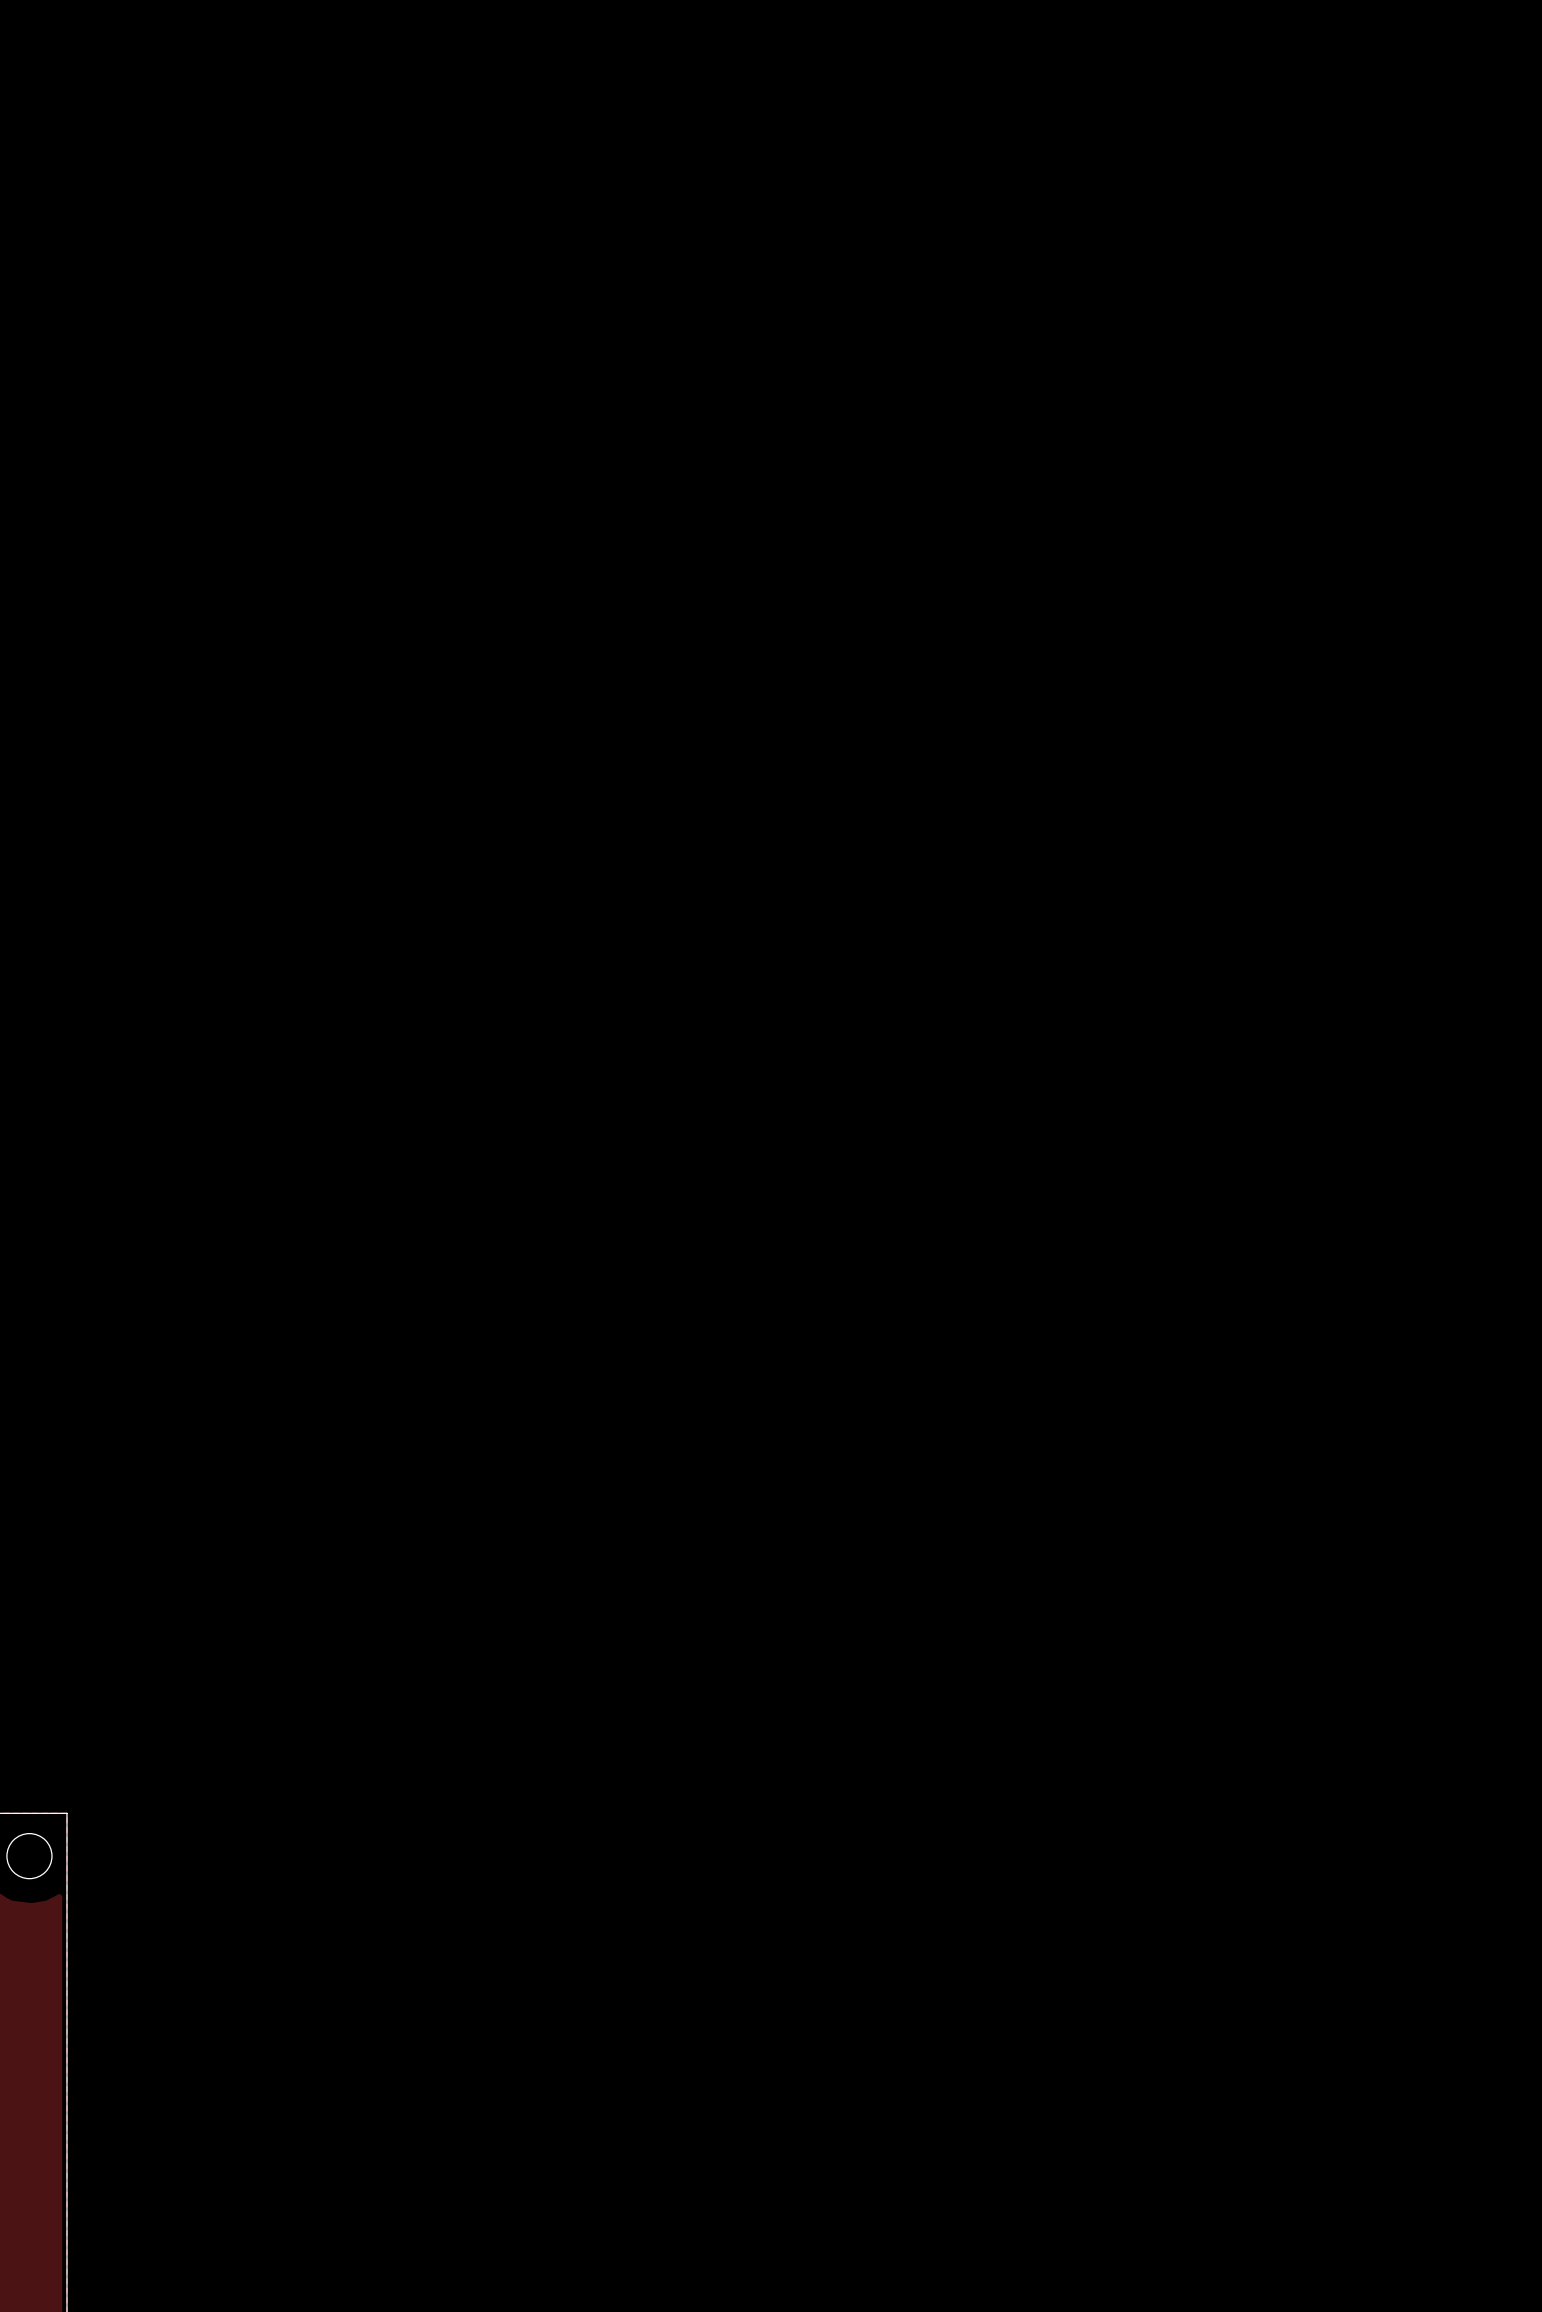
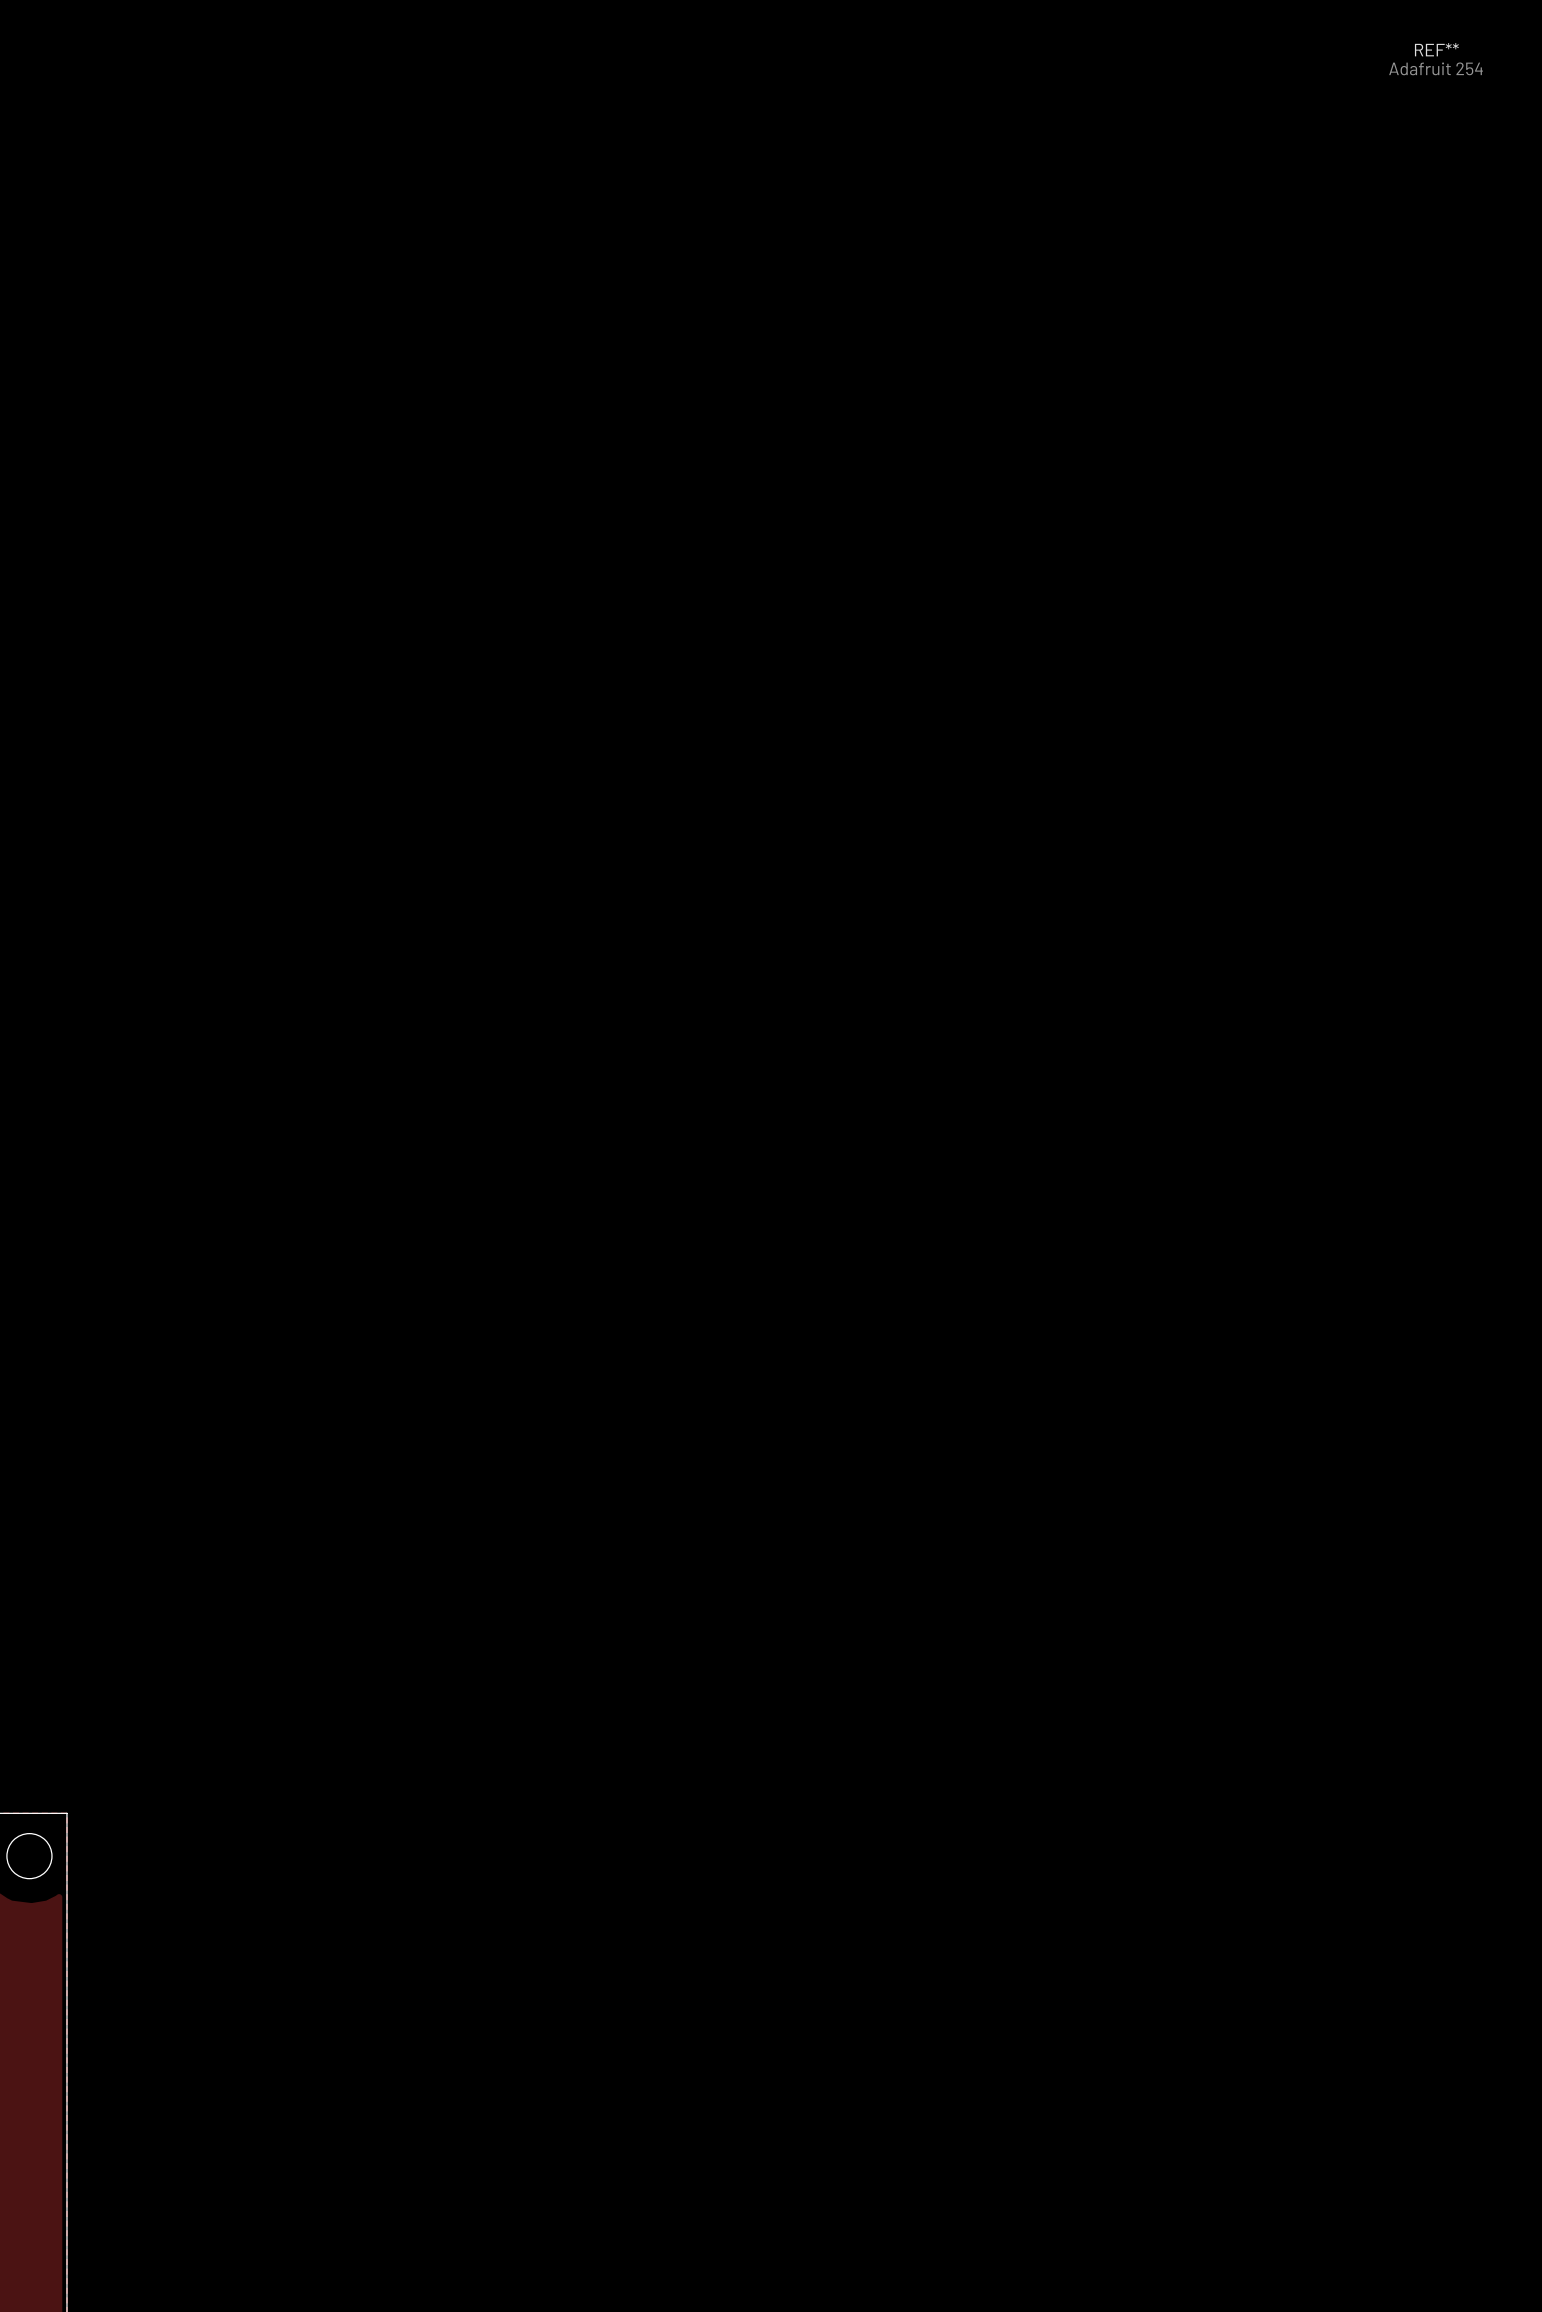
REF**: none -> Adafruit 254 (1436, 59)

